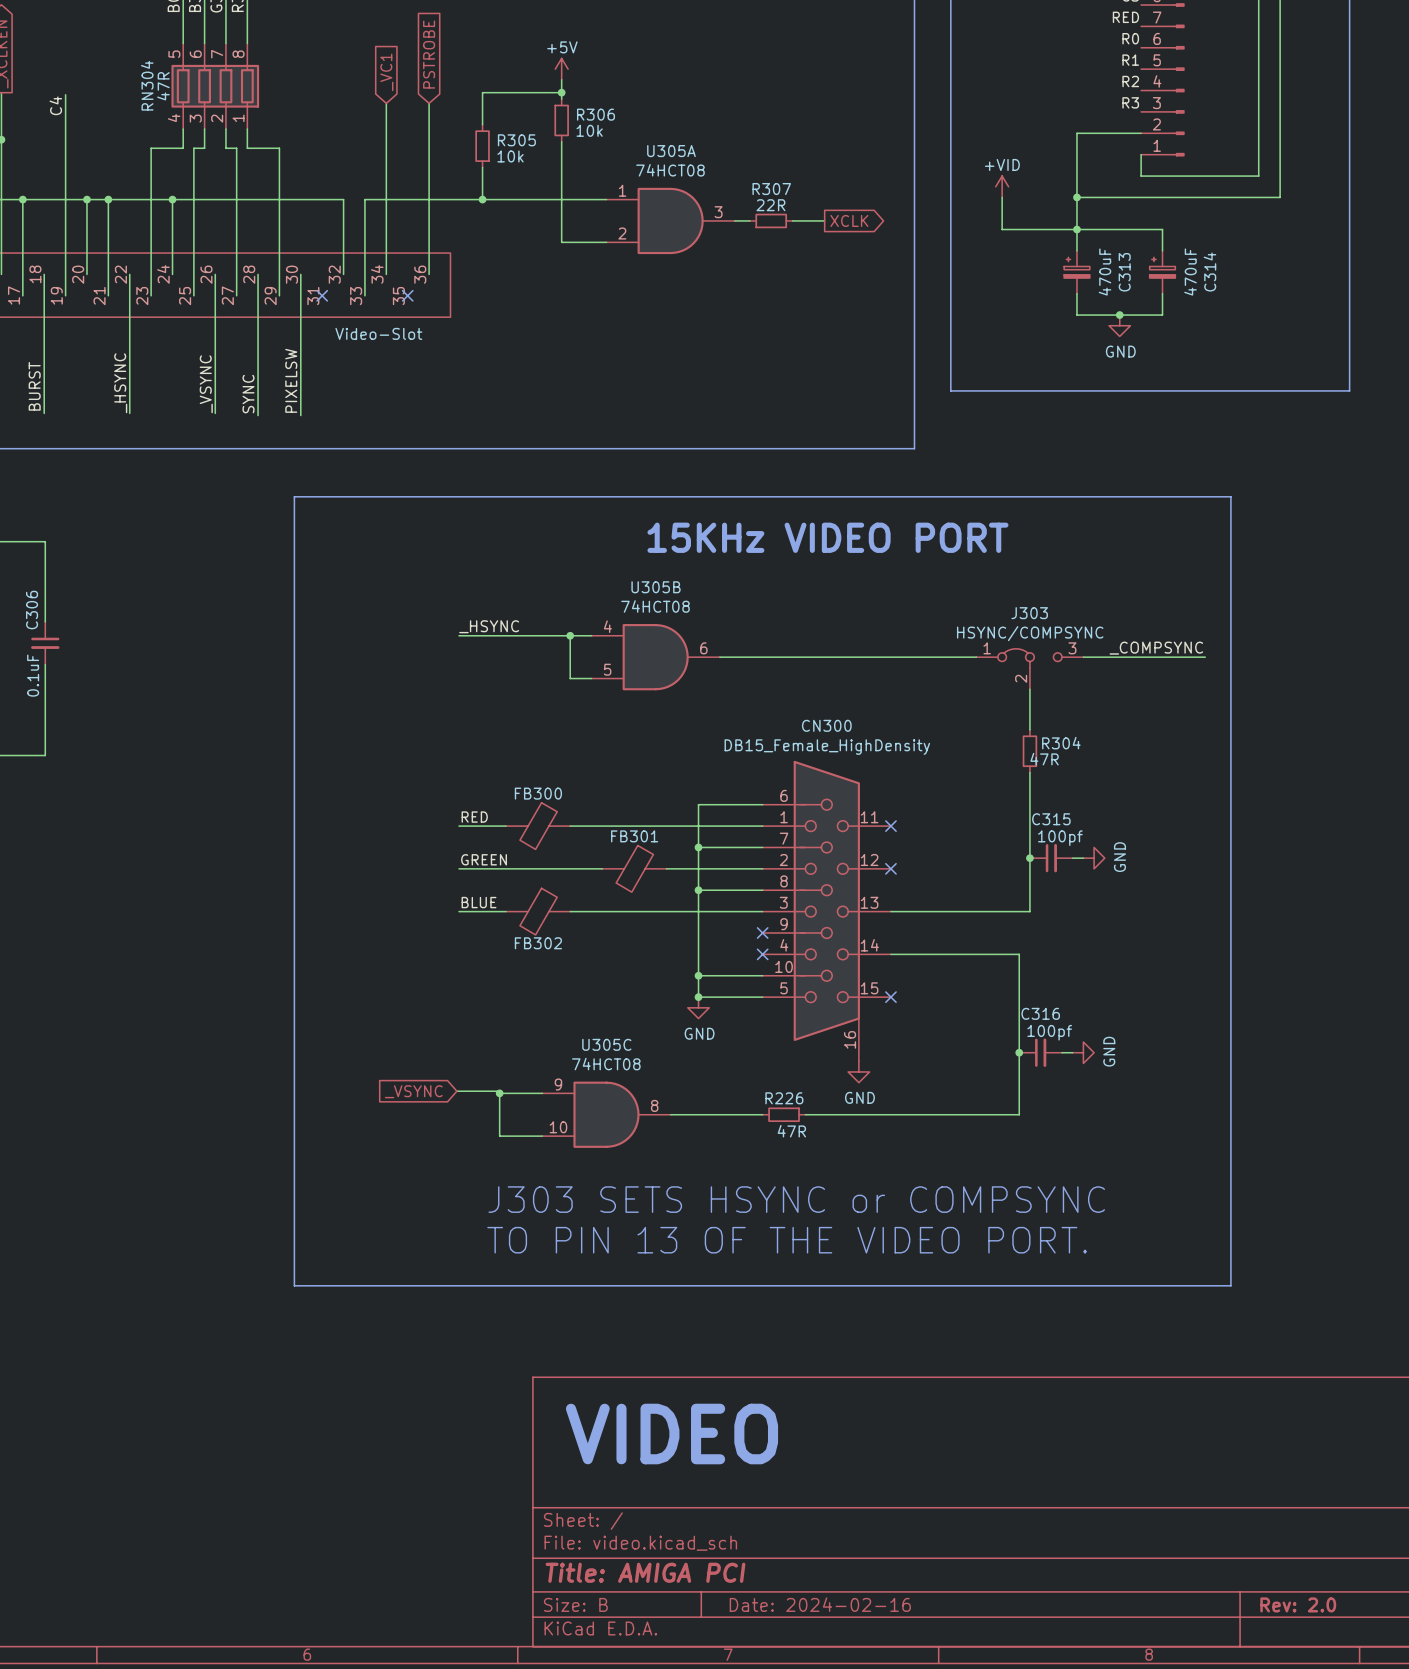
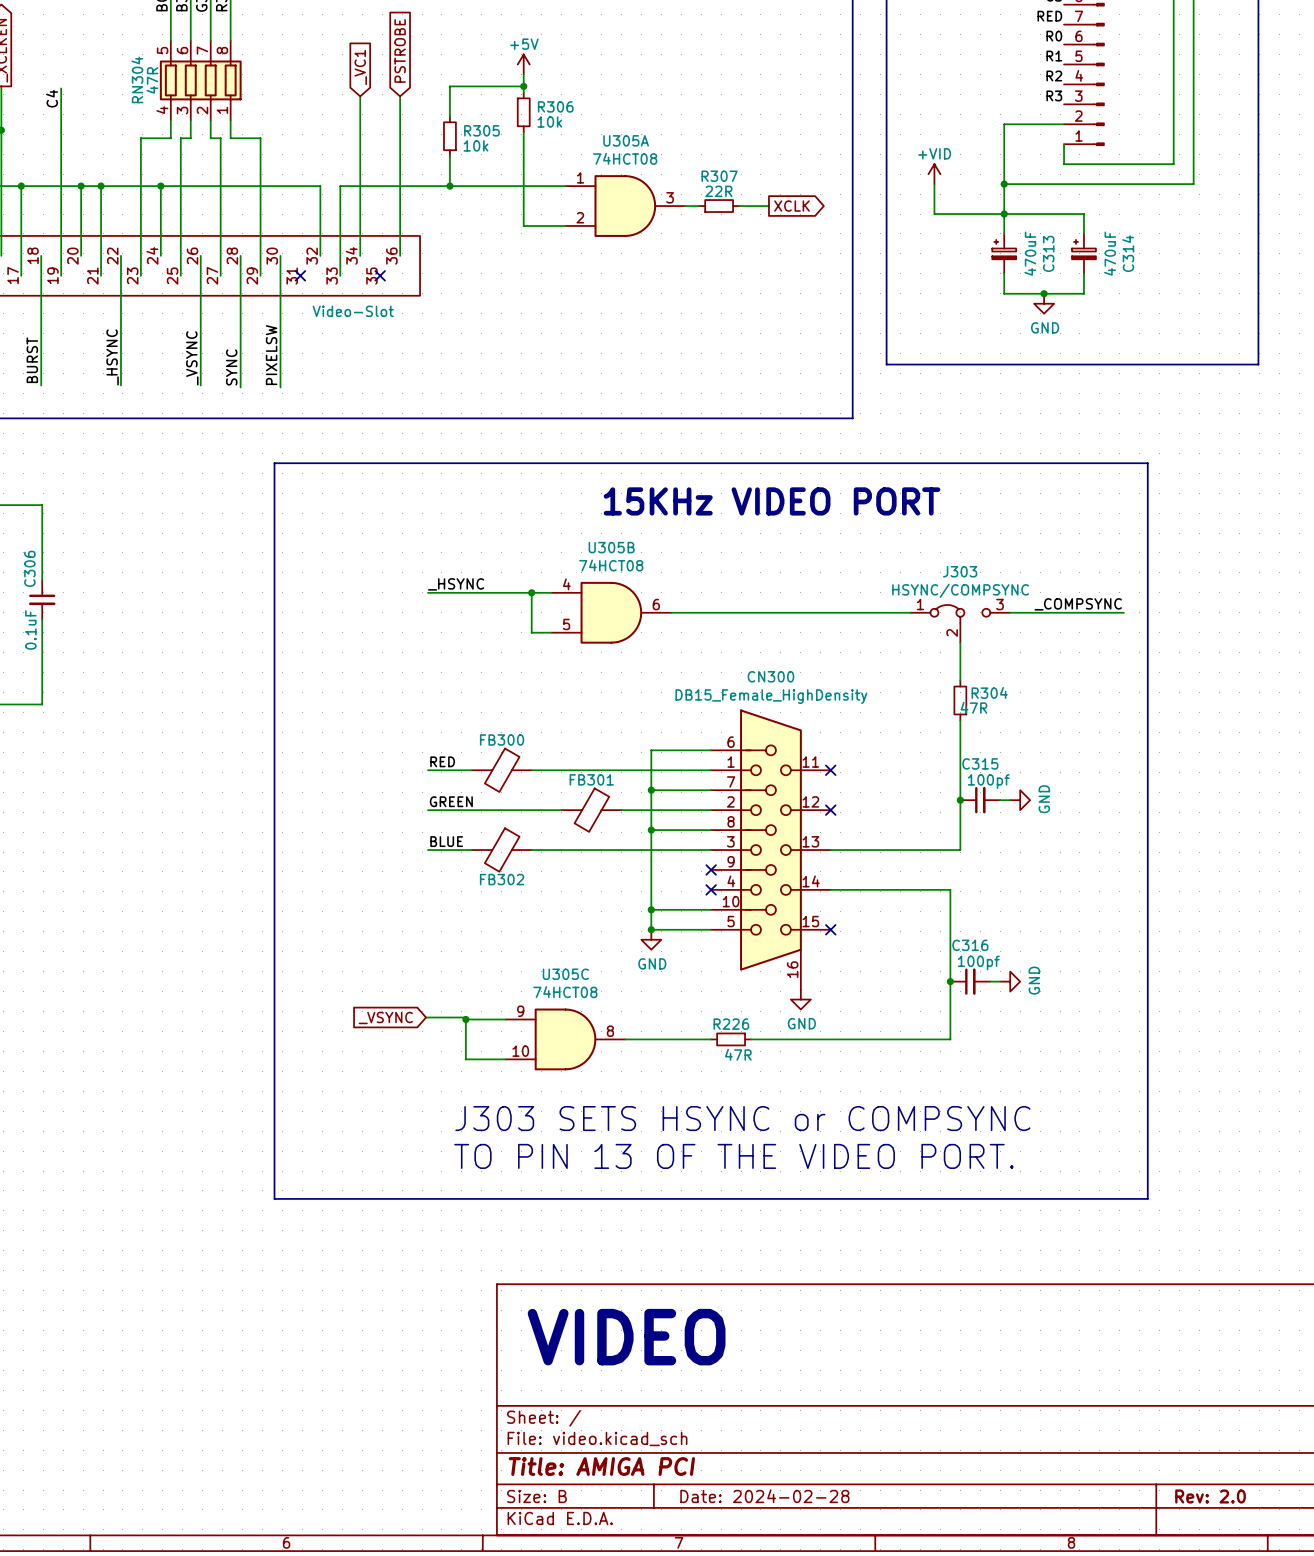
title block: Date: 2024-02-16 (820, 1604) -> Date: 2024-02-28 (764, 1496)

